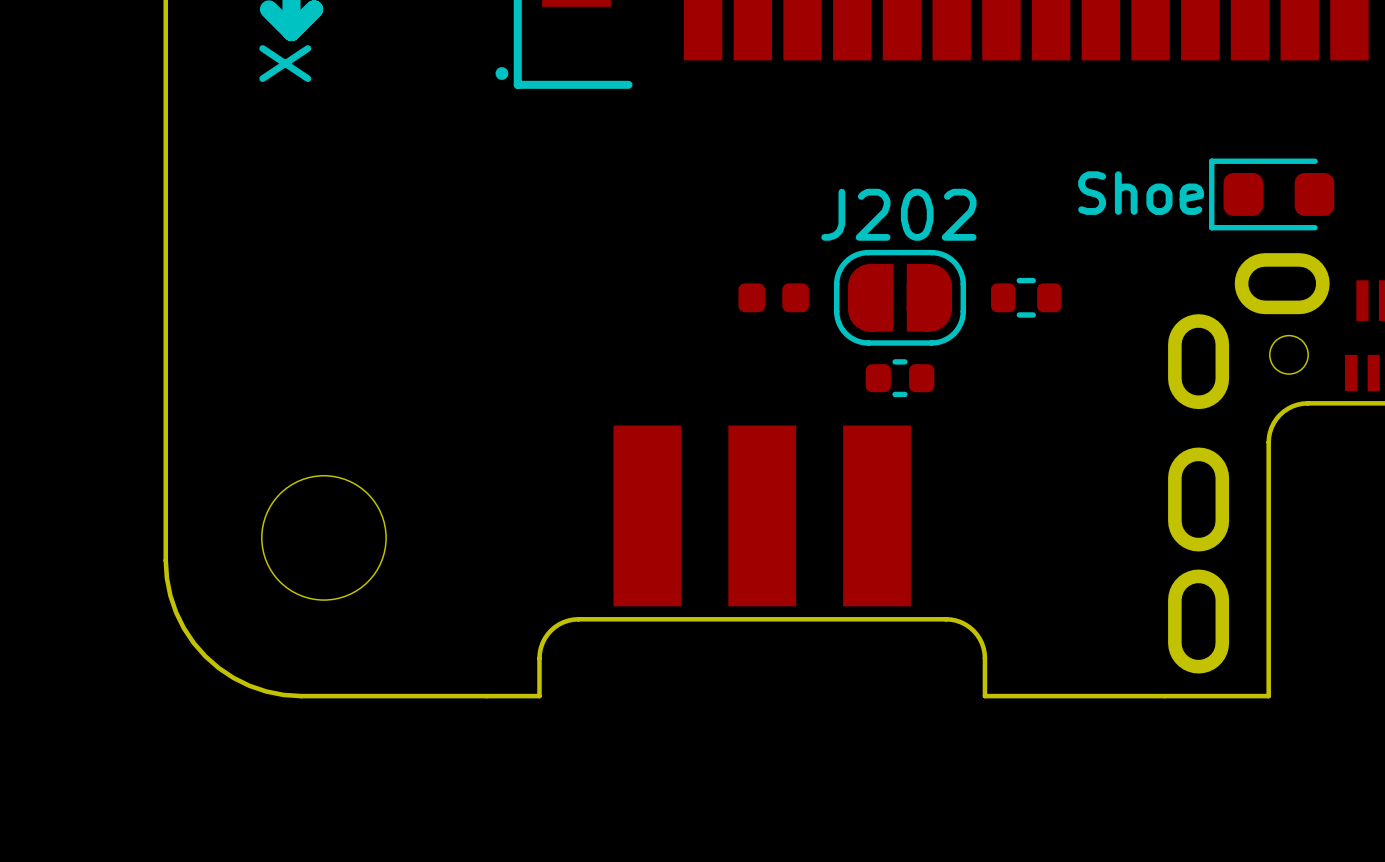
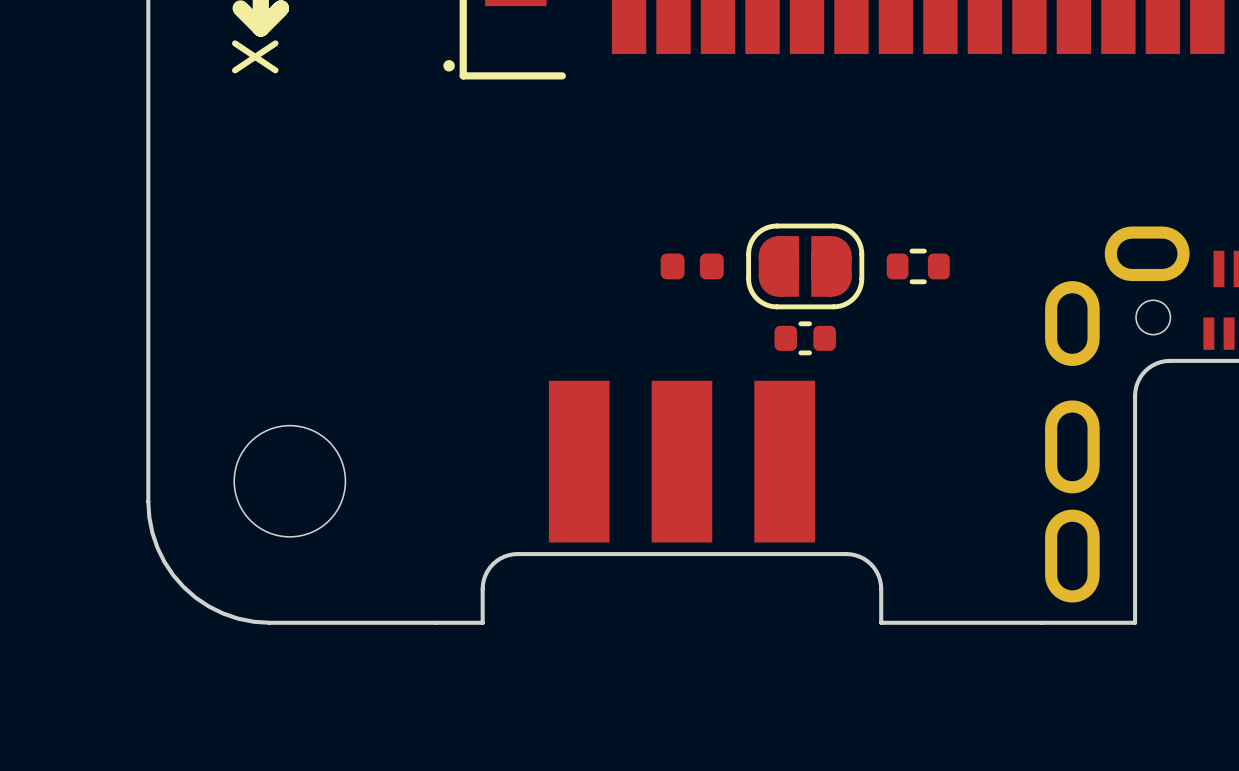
text: Shoe (1141, 193) -> none
part: (1271, 194) -> none
J202 name: J202 (898, 214) -> none

